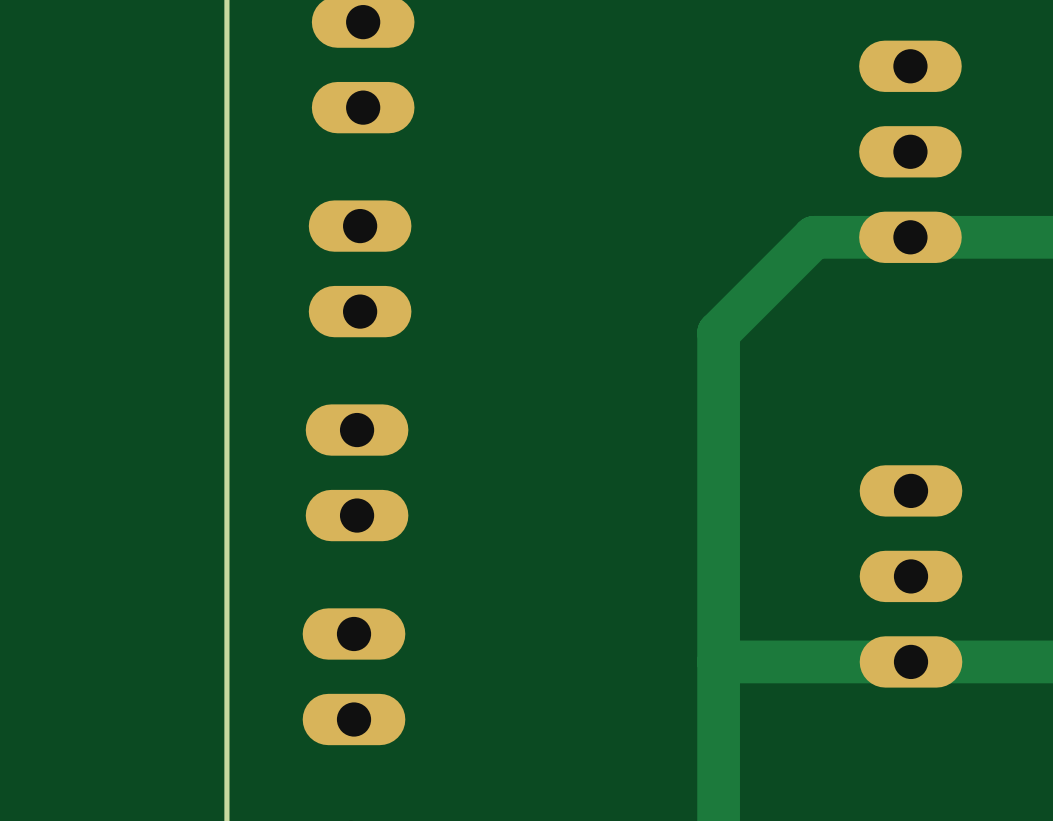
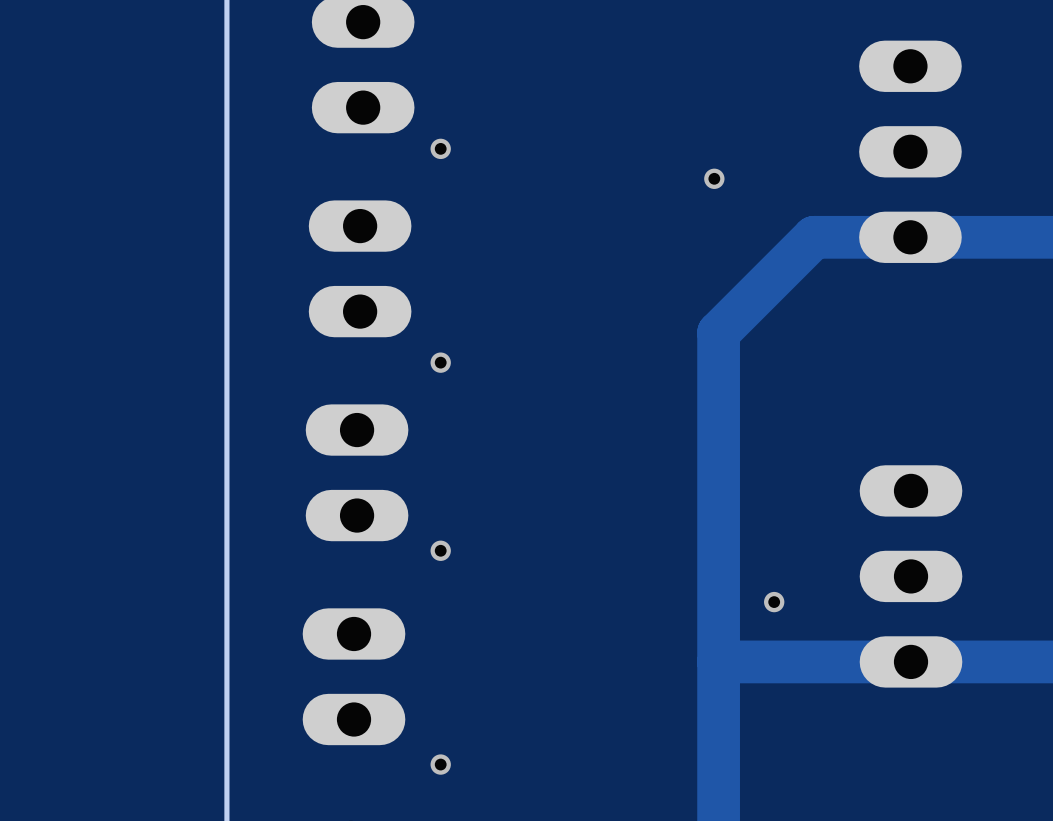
via: none -> (440, 148)
via: none -> (714, 178)
via: none -> (440, 362)
via: none -> (440, 550)
via: none -> (774, 602)
via: none -> (440, 764)

